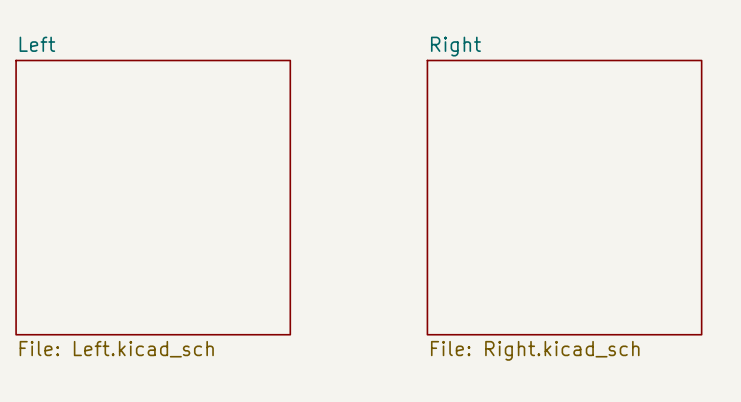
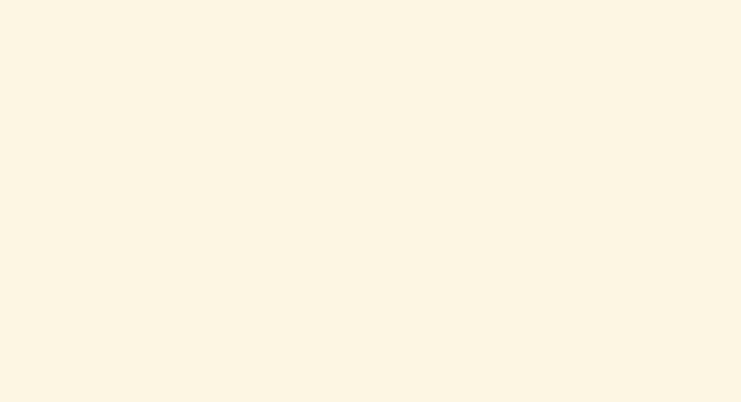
sheet Left: File: Left.kicad_sch (153, 197) -> none
sheet Right: File: Right.kicad_sch (564, 197) -> none

